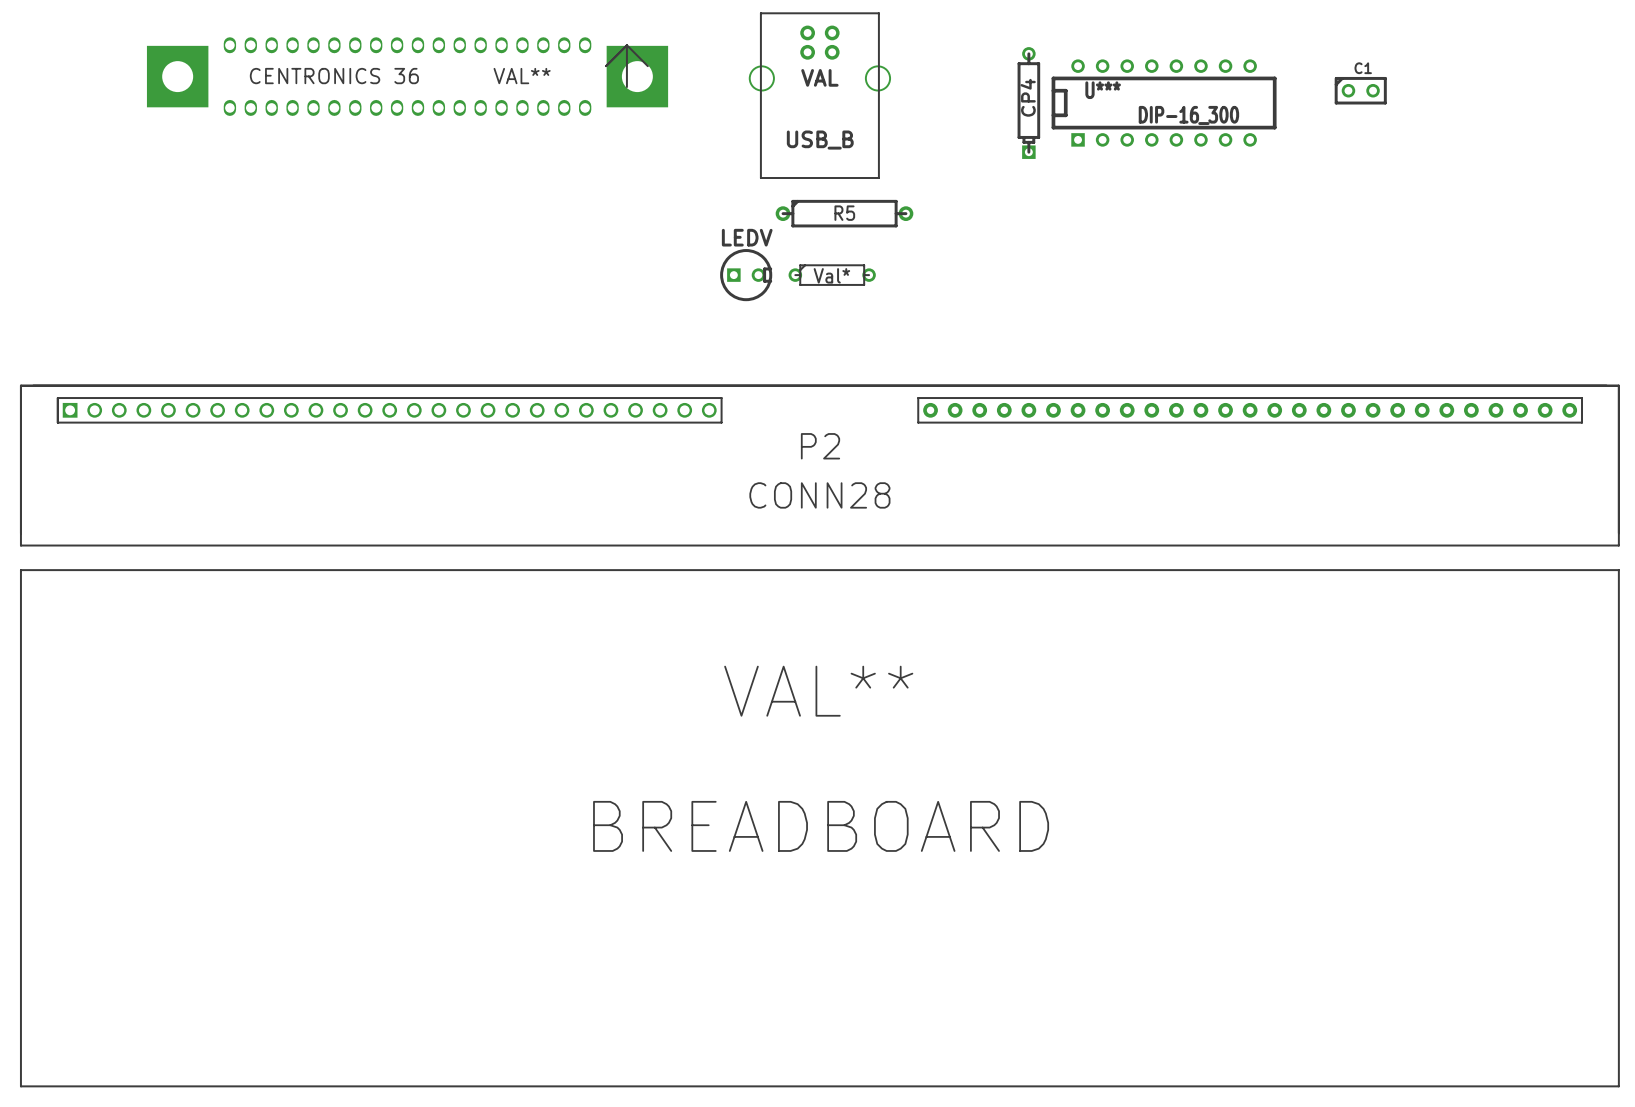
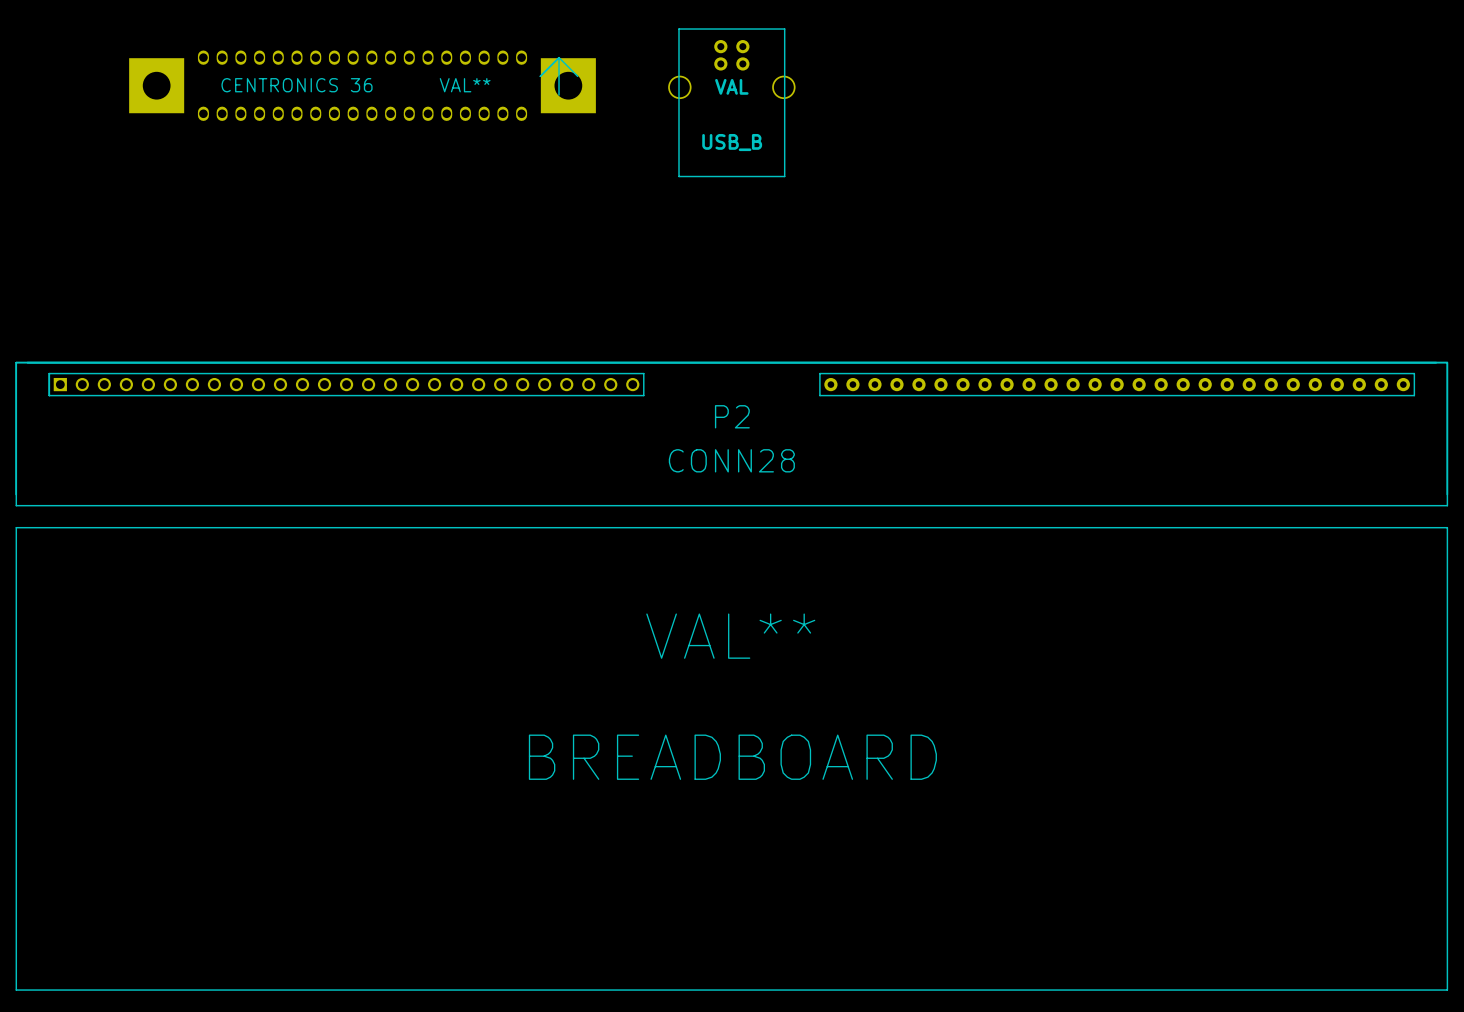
C1: (1360, 90) -> none
CP4: (1028, 103) -> none
U***: DIP-16_300 (1164, 103) -> none
R5: (844, 213) -> none
LEDV: (746, 275) -> none
part: Val* (832, 275) -> none

